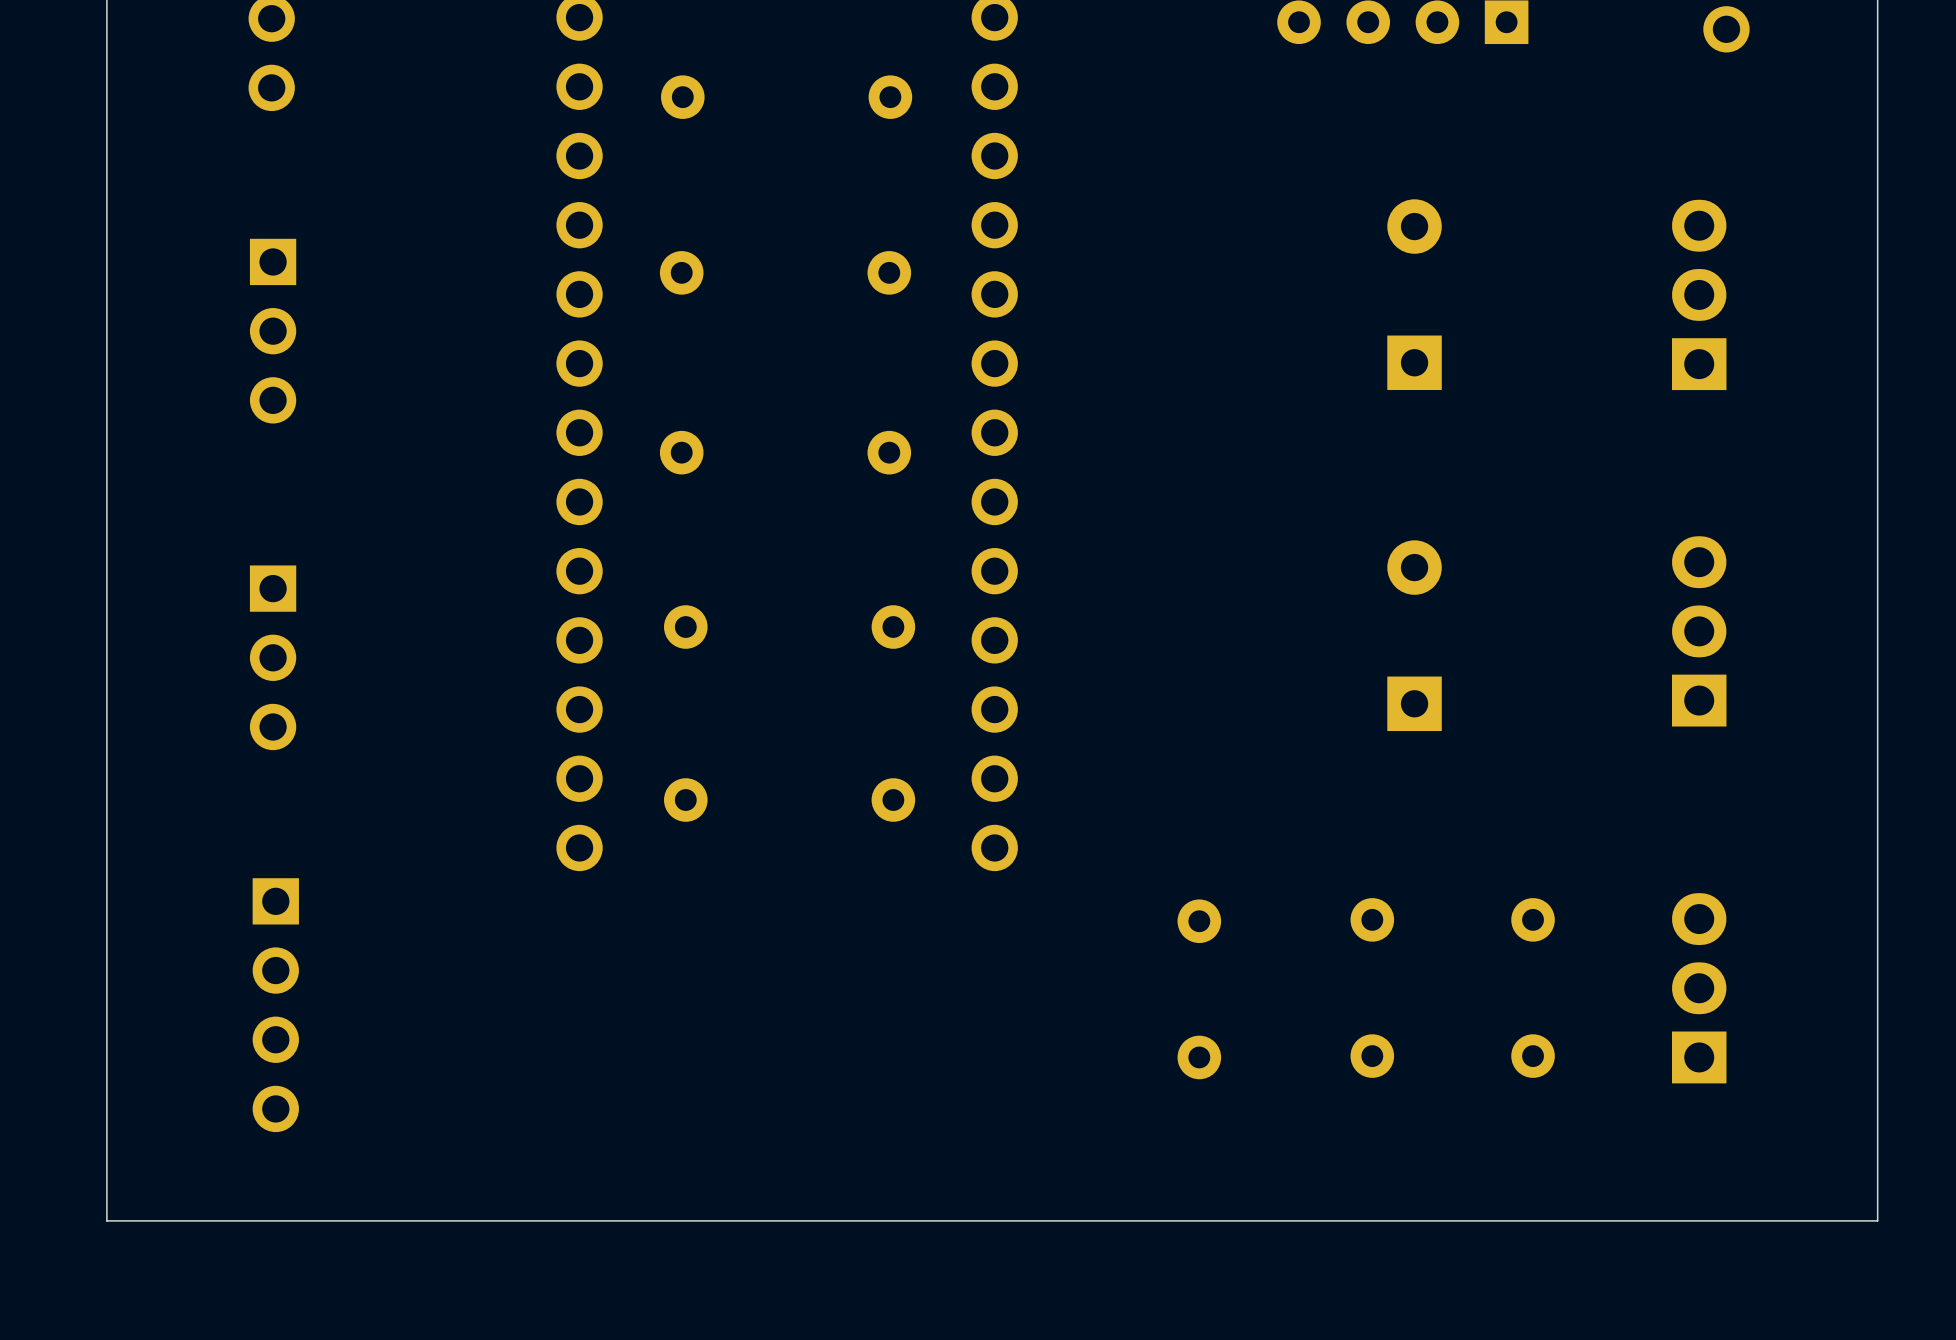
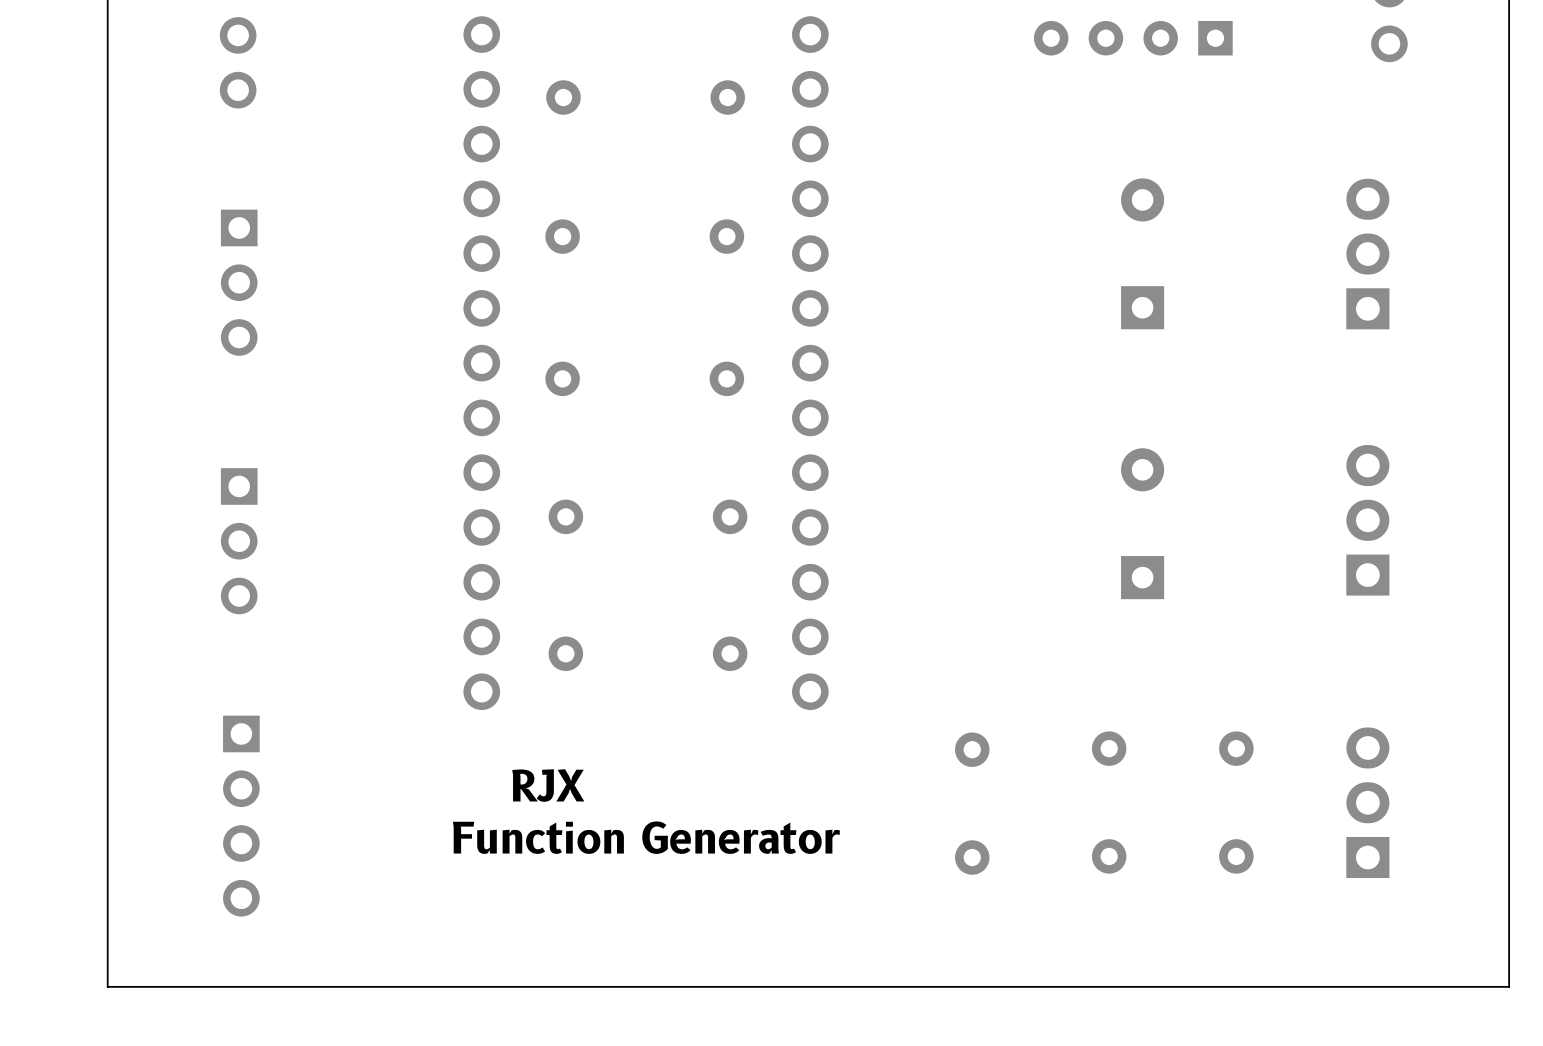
text: none -> RJX (548, 785)
text: none -> Function Generator (646, 837)

